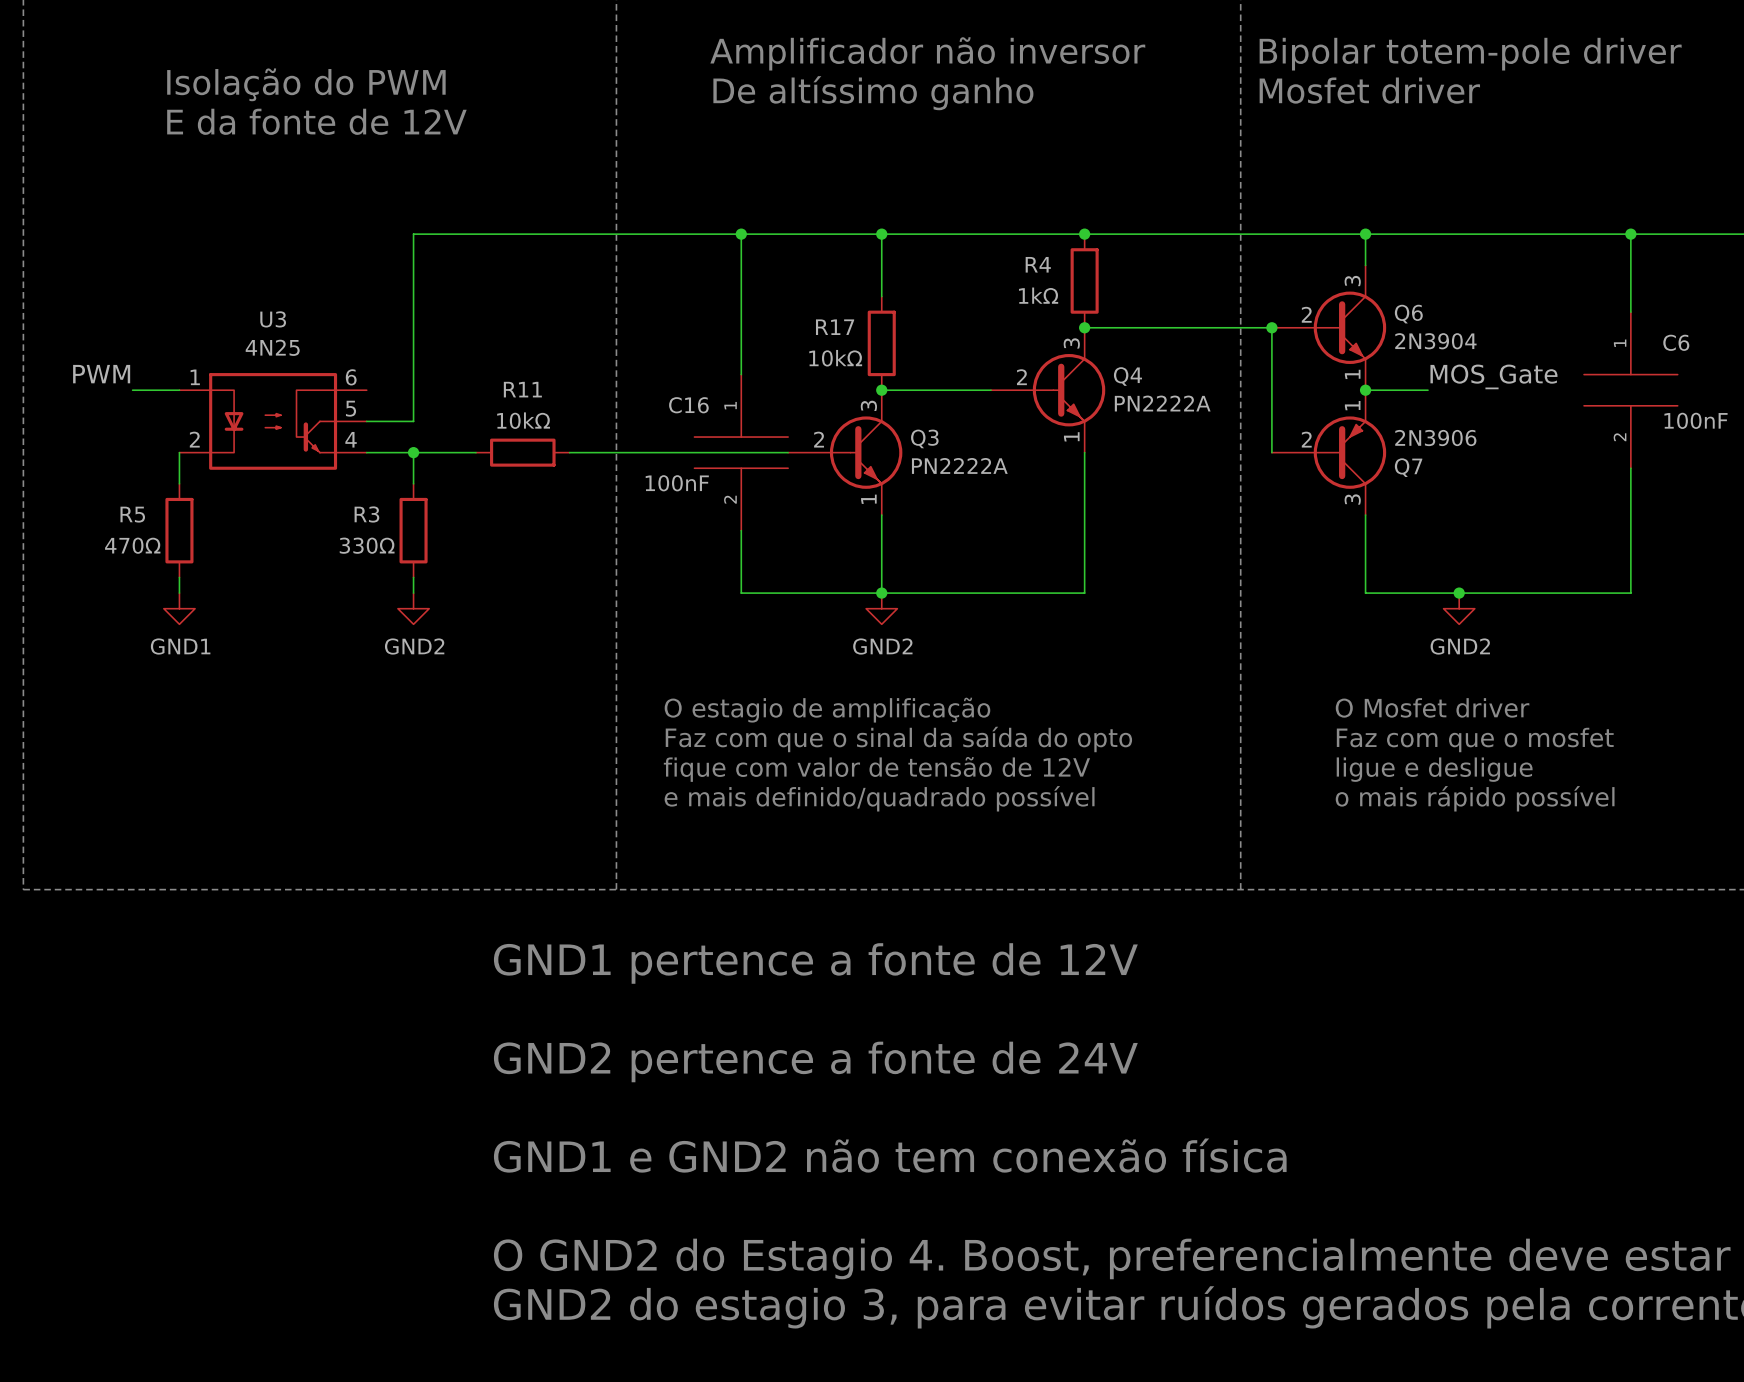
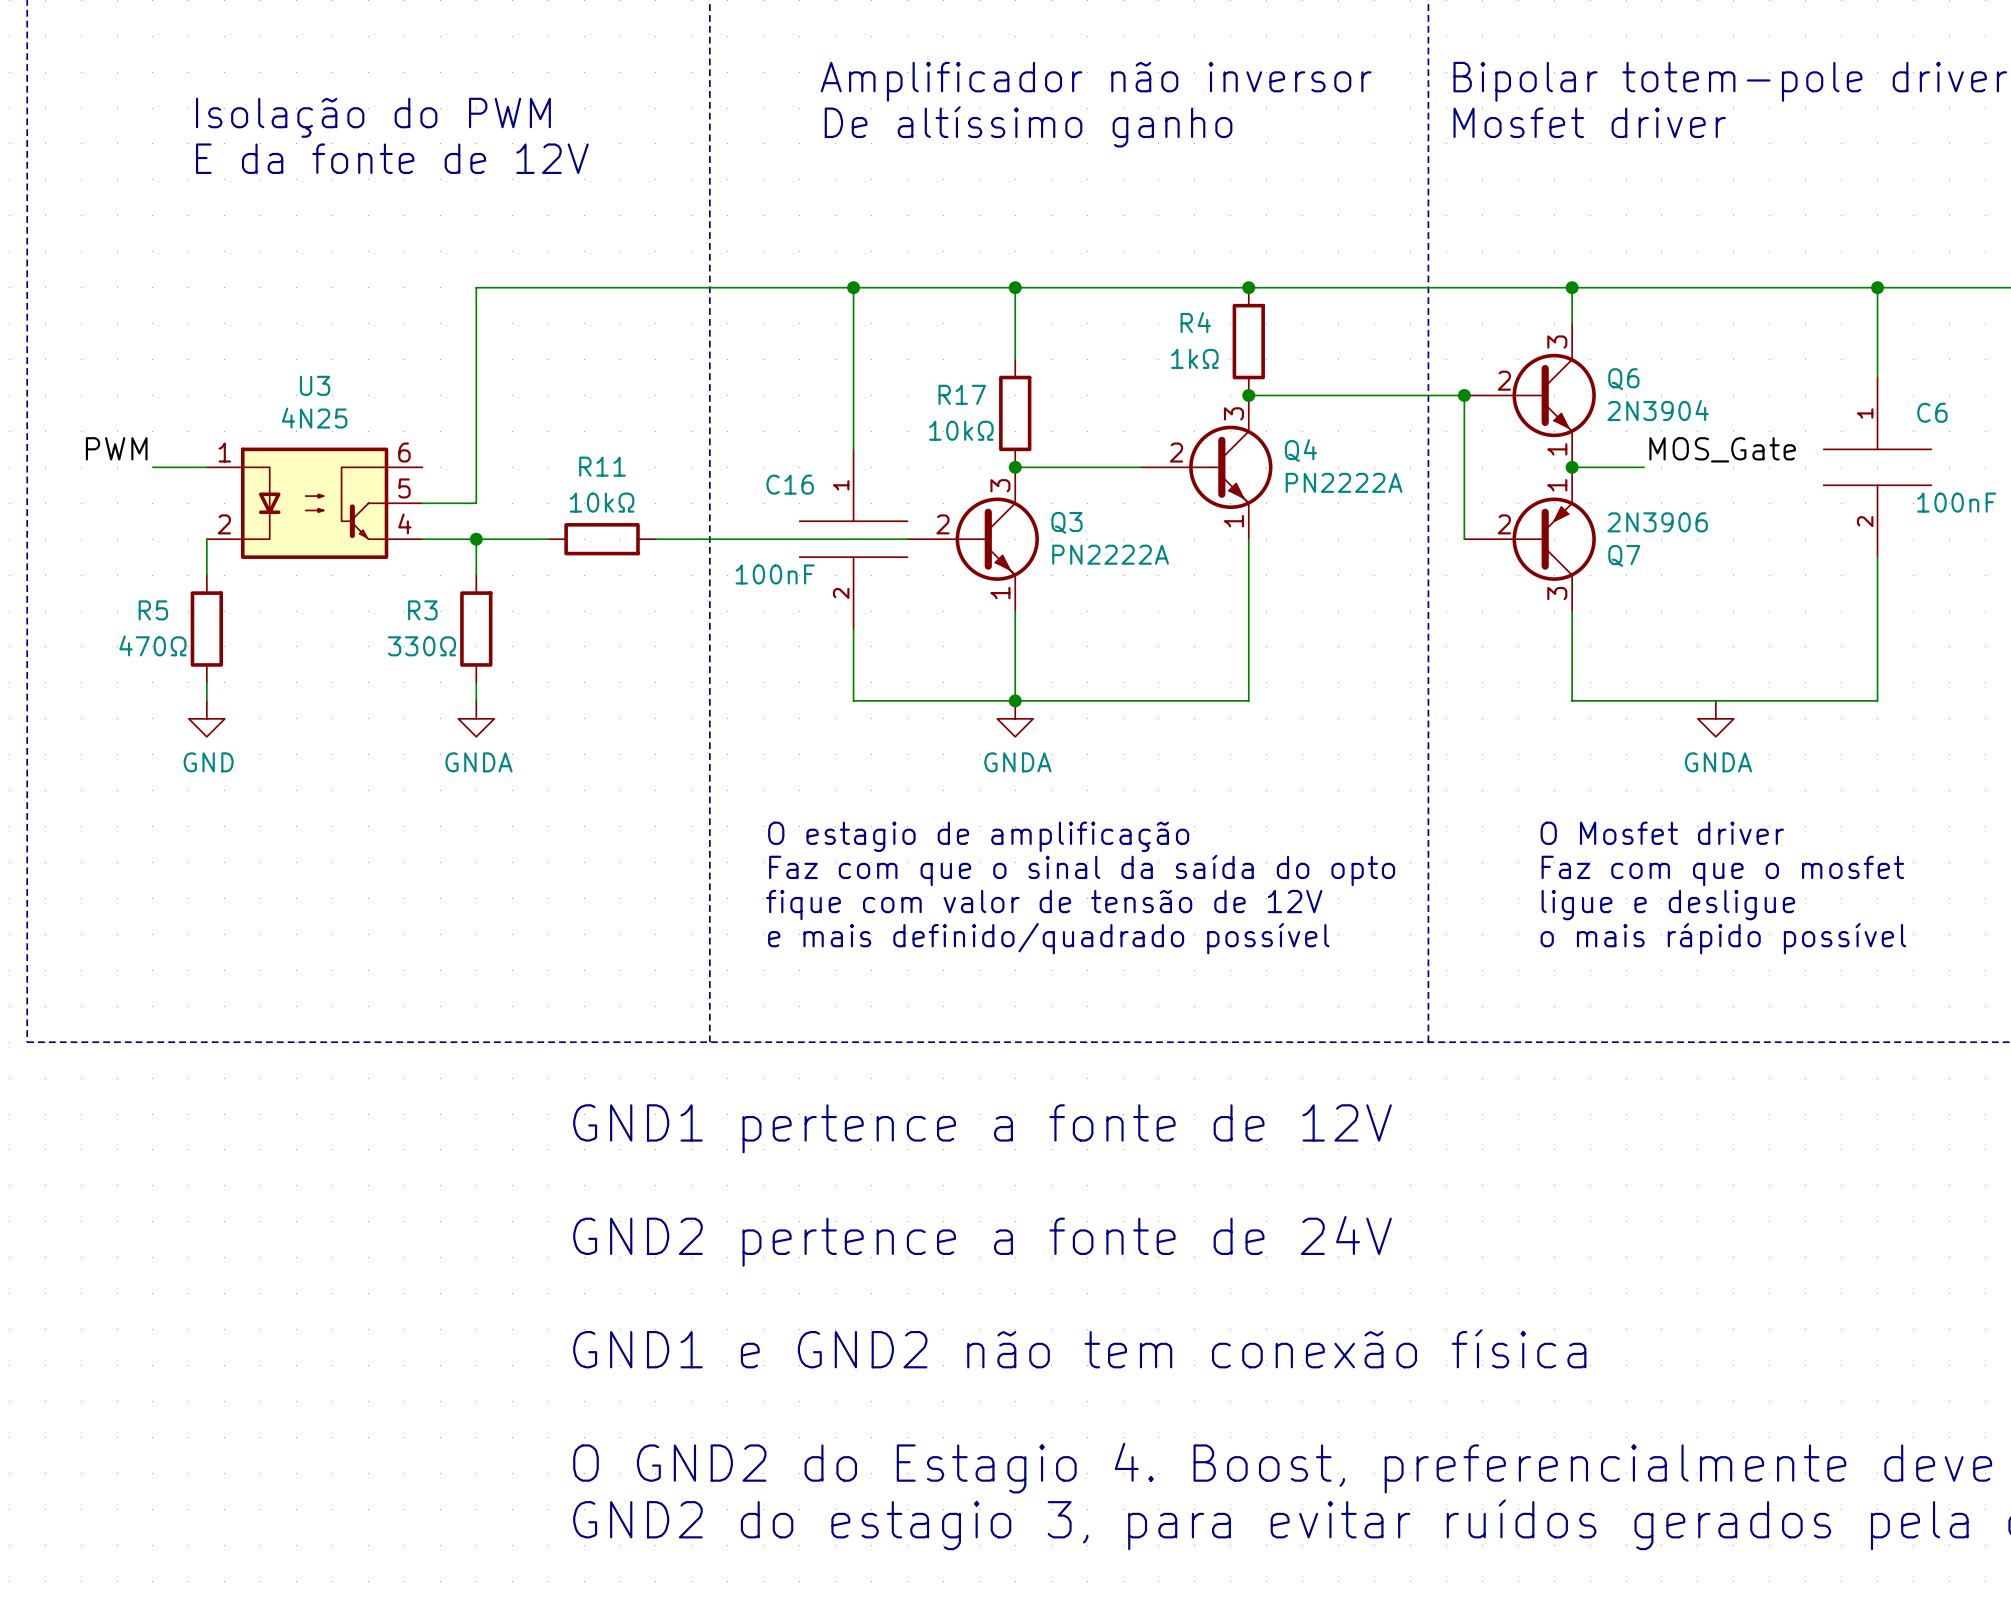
junction: (1459, 593) -> none
power symbol: GND1 (179, 608) -> GND (206, 718)
power symbol: GND2 (413, 608) -> GNDA (476, 718)
power symbol: GND2 (881, 608) -> GNDA (1015, 718)
power symbol: GND2 (1459, 608) -> none
power symbol: none -> GNDA (1715, 718)

